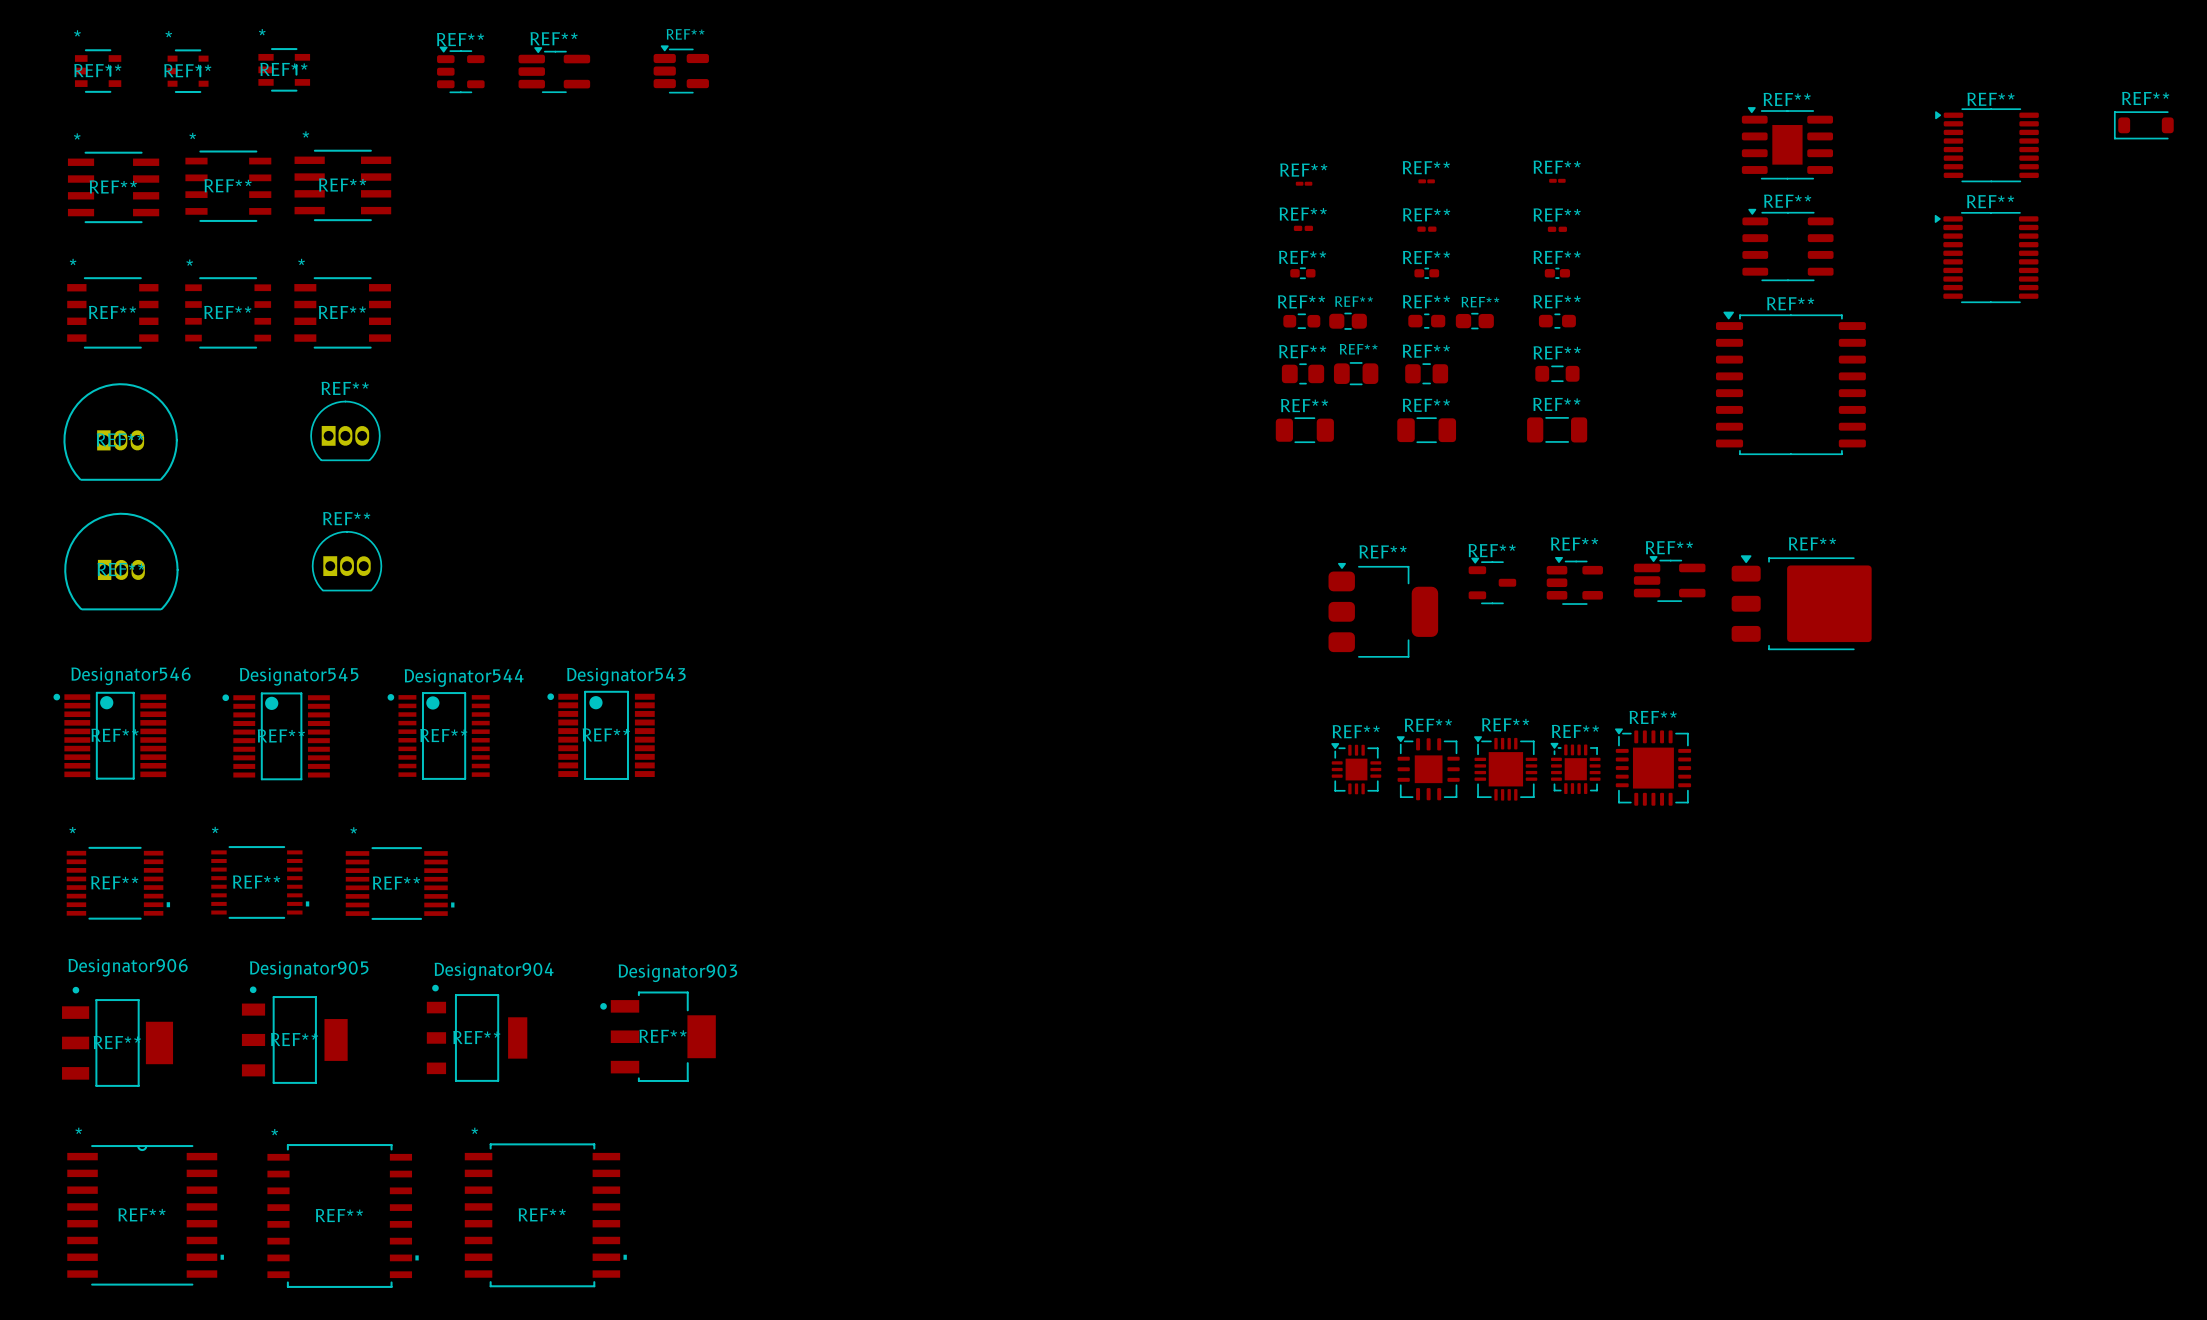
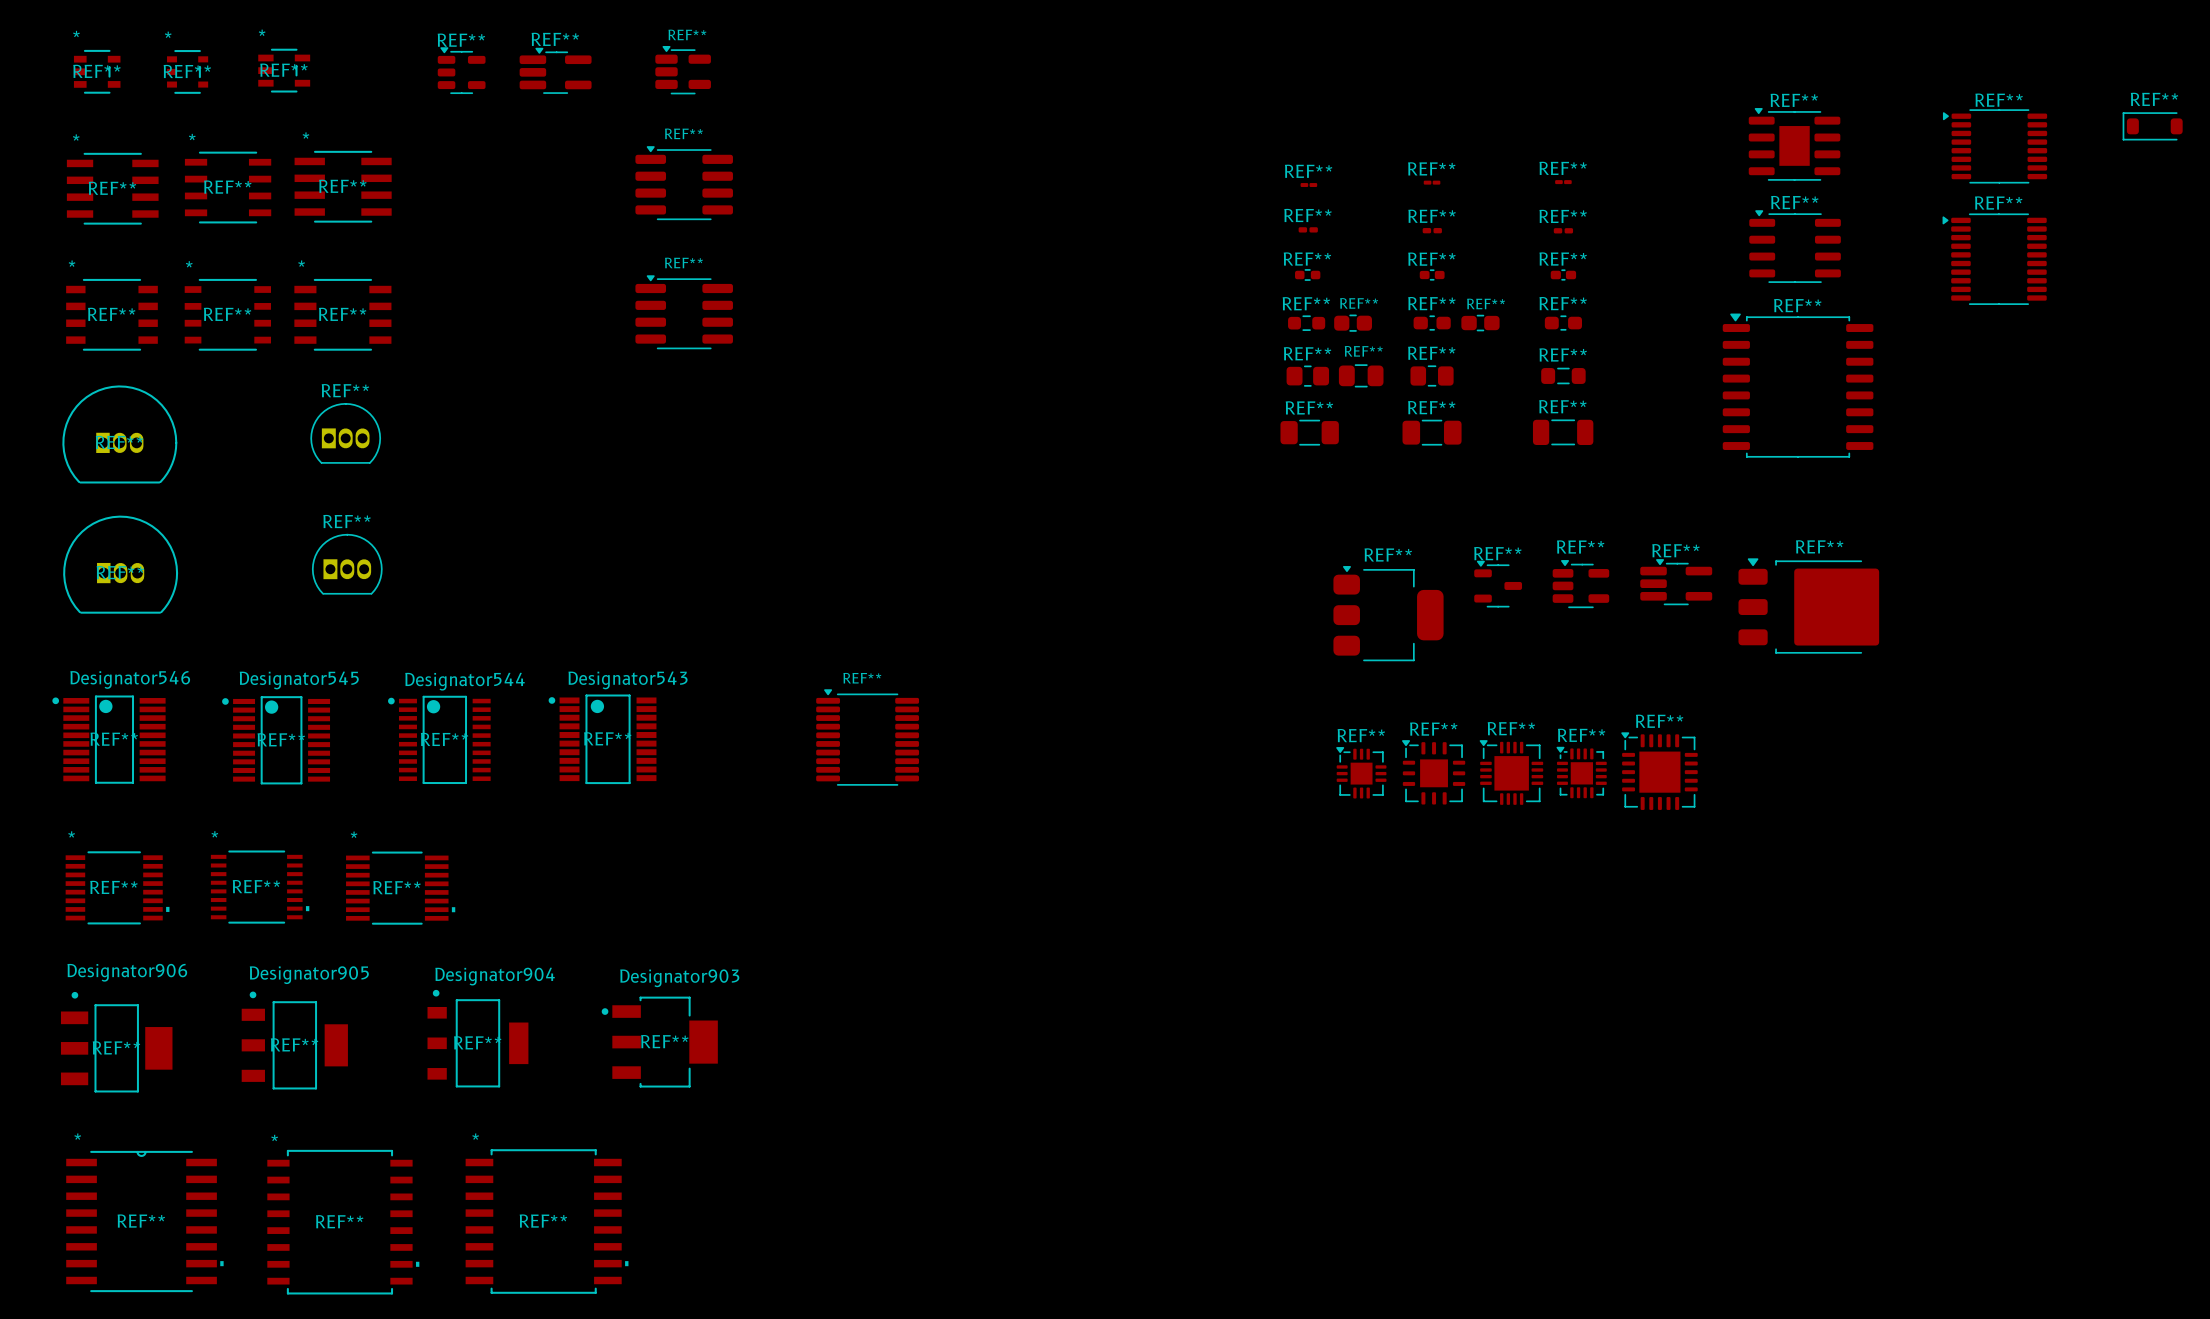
REF**: none -> (684, 183)
REF**: none -> (684, 312)
REF**: none -> (867, 737)

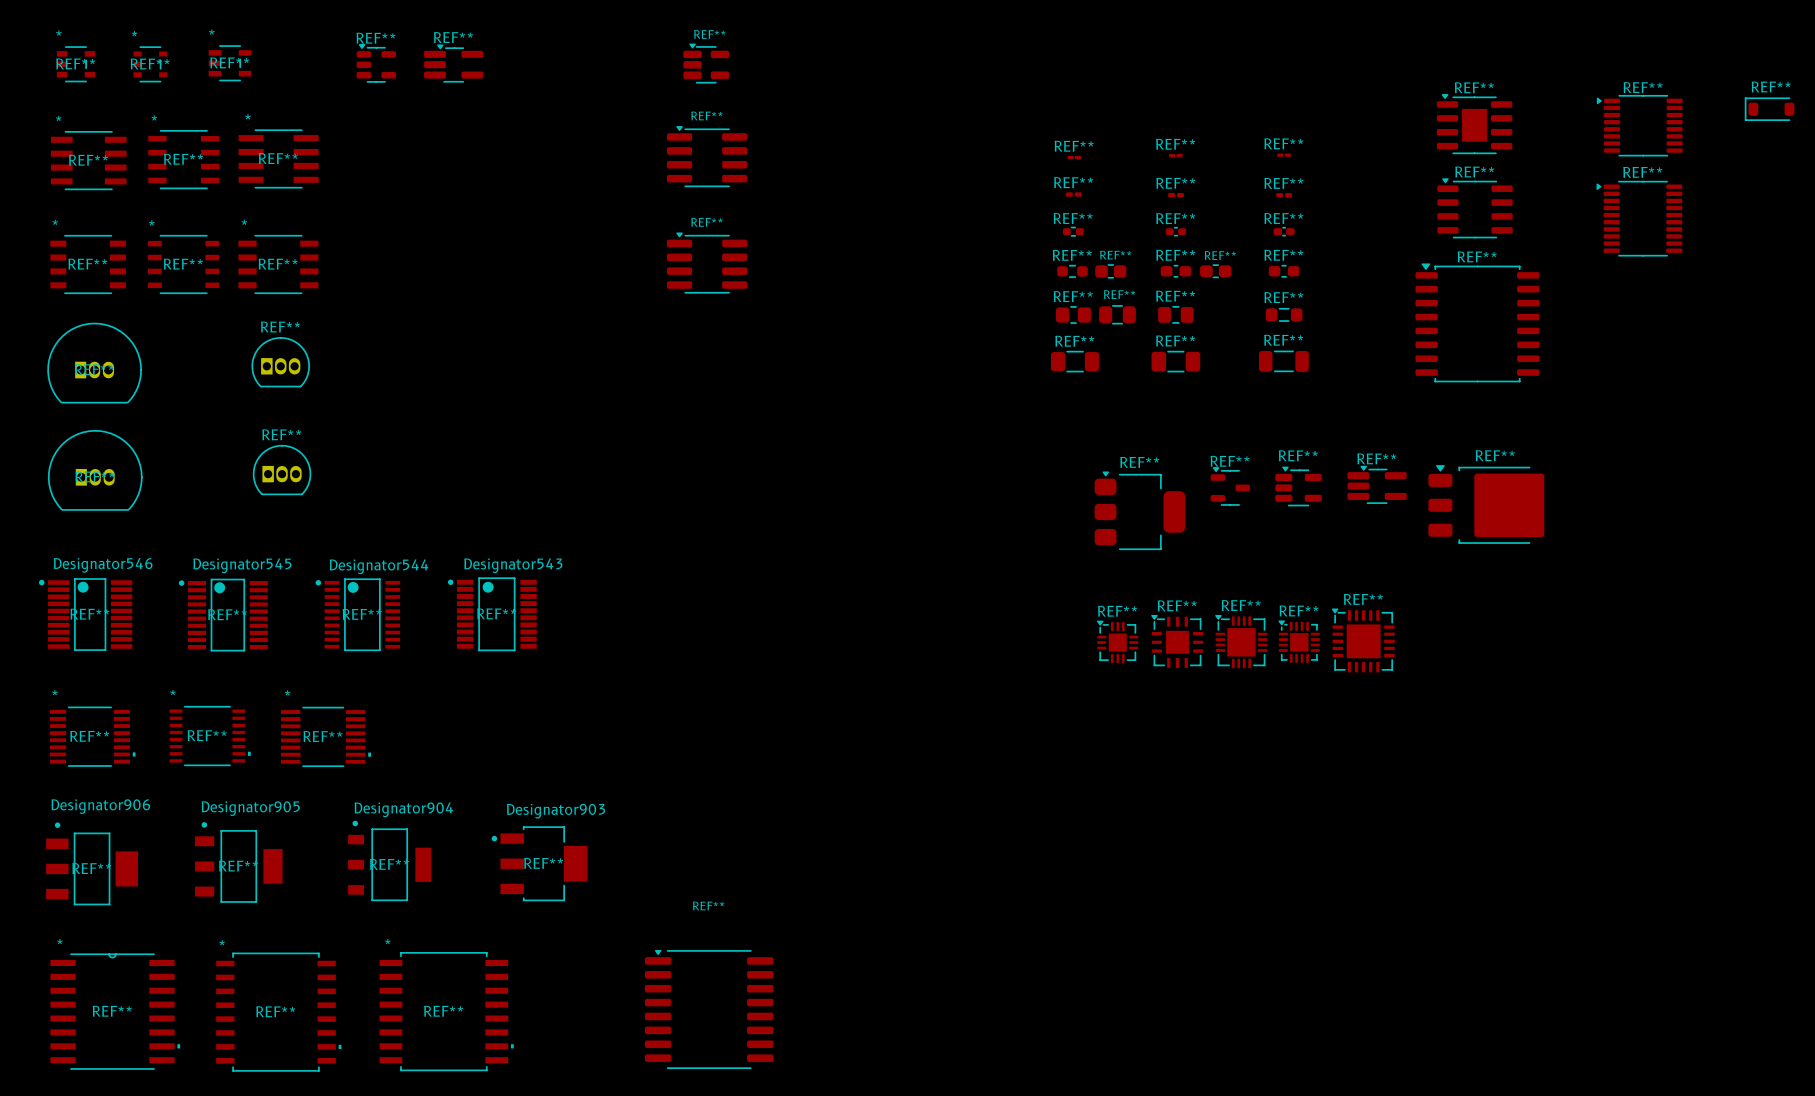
REF** position: (683, 70) -> (706, 63)
REF**: (684, 183) -> none
REF**: none -> (707, 156)
REF**: (684, 312) -> none
REF**: none -> (707, 262)
REF**: (867, 737) -> none
REF**: none -> (709, 1009)

